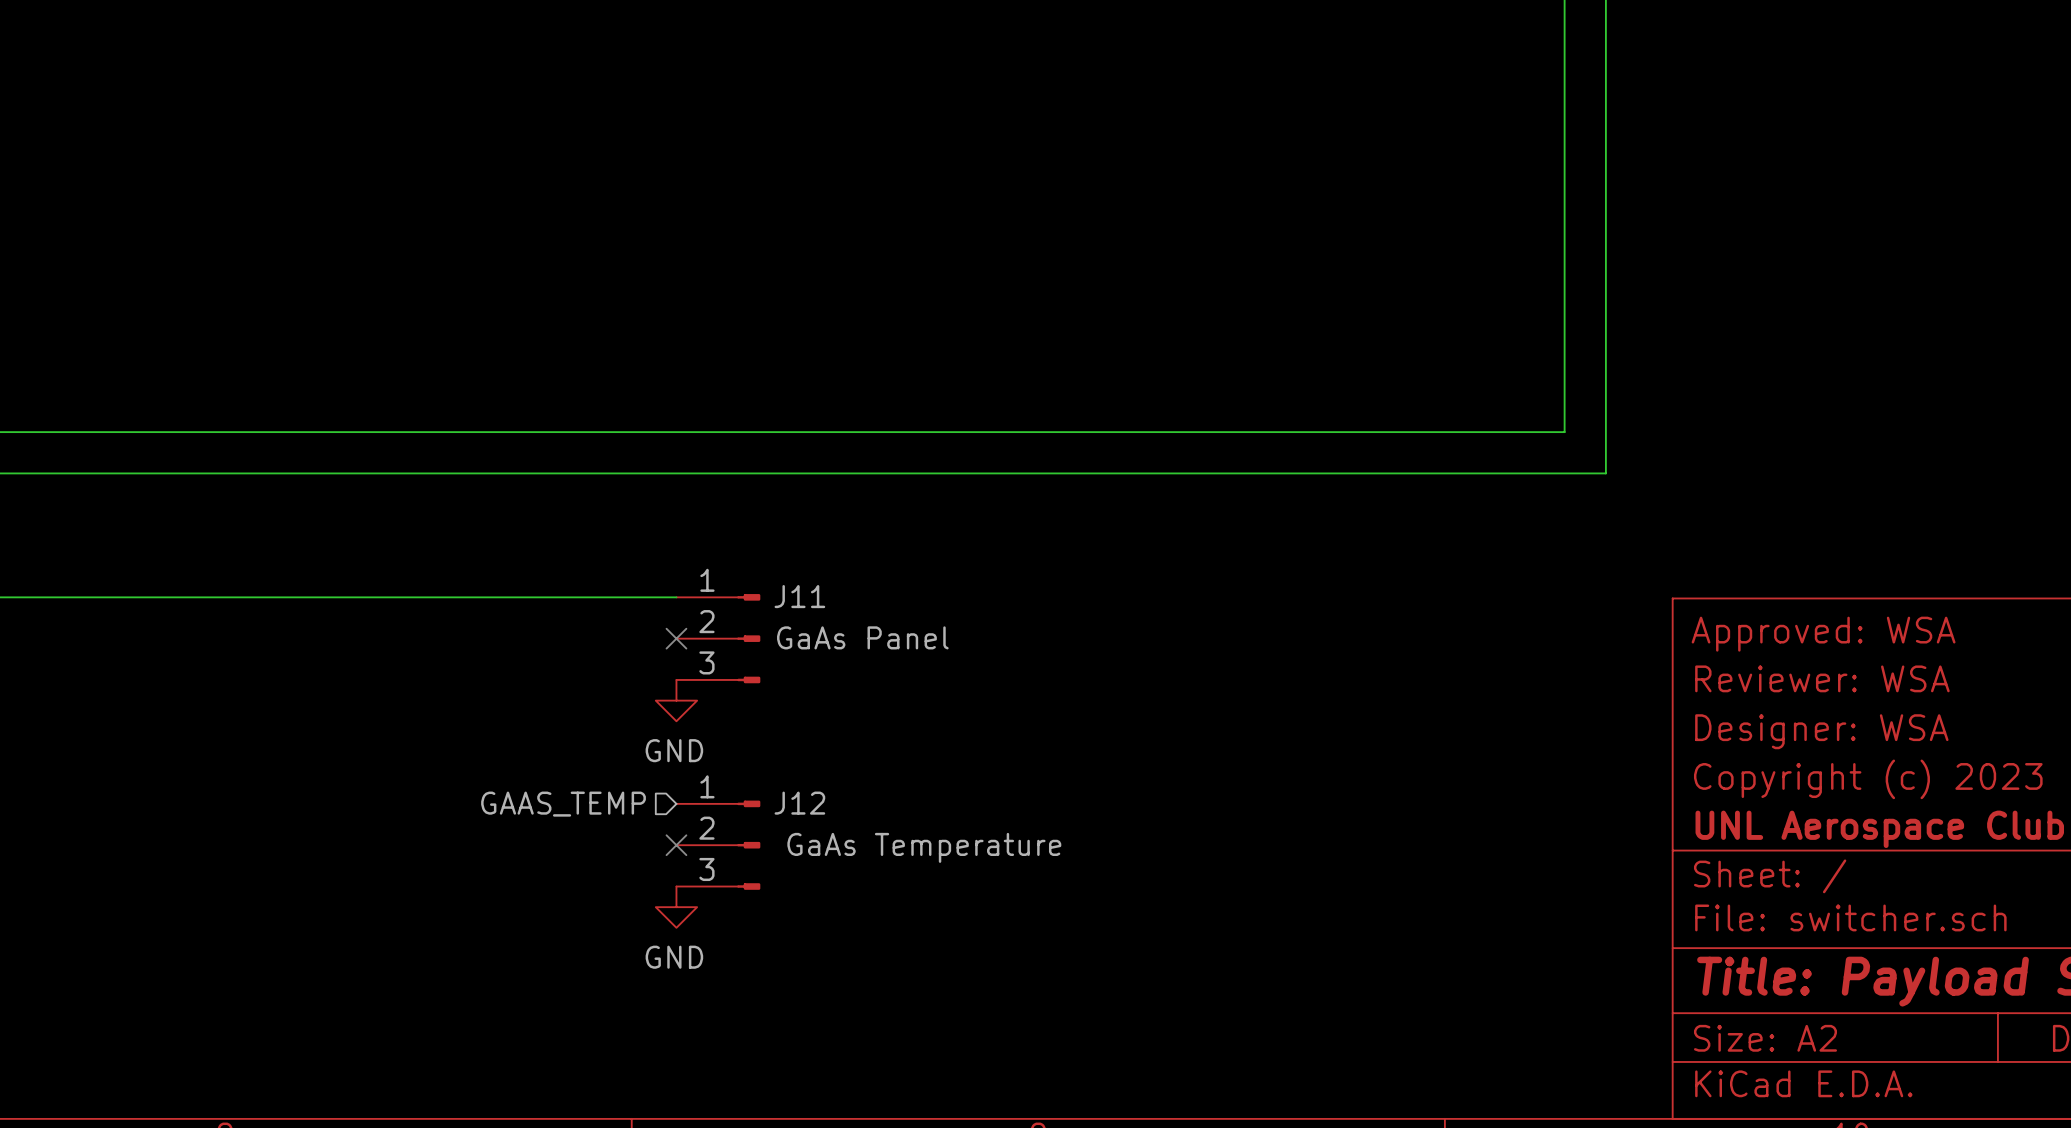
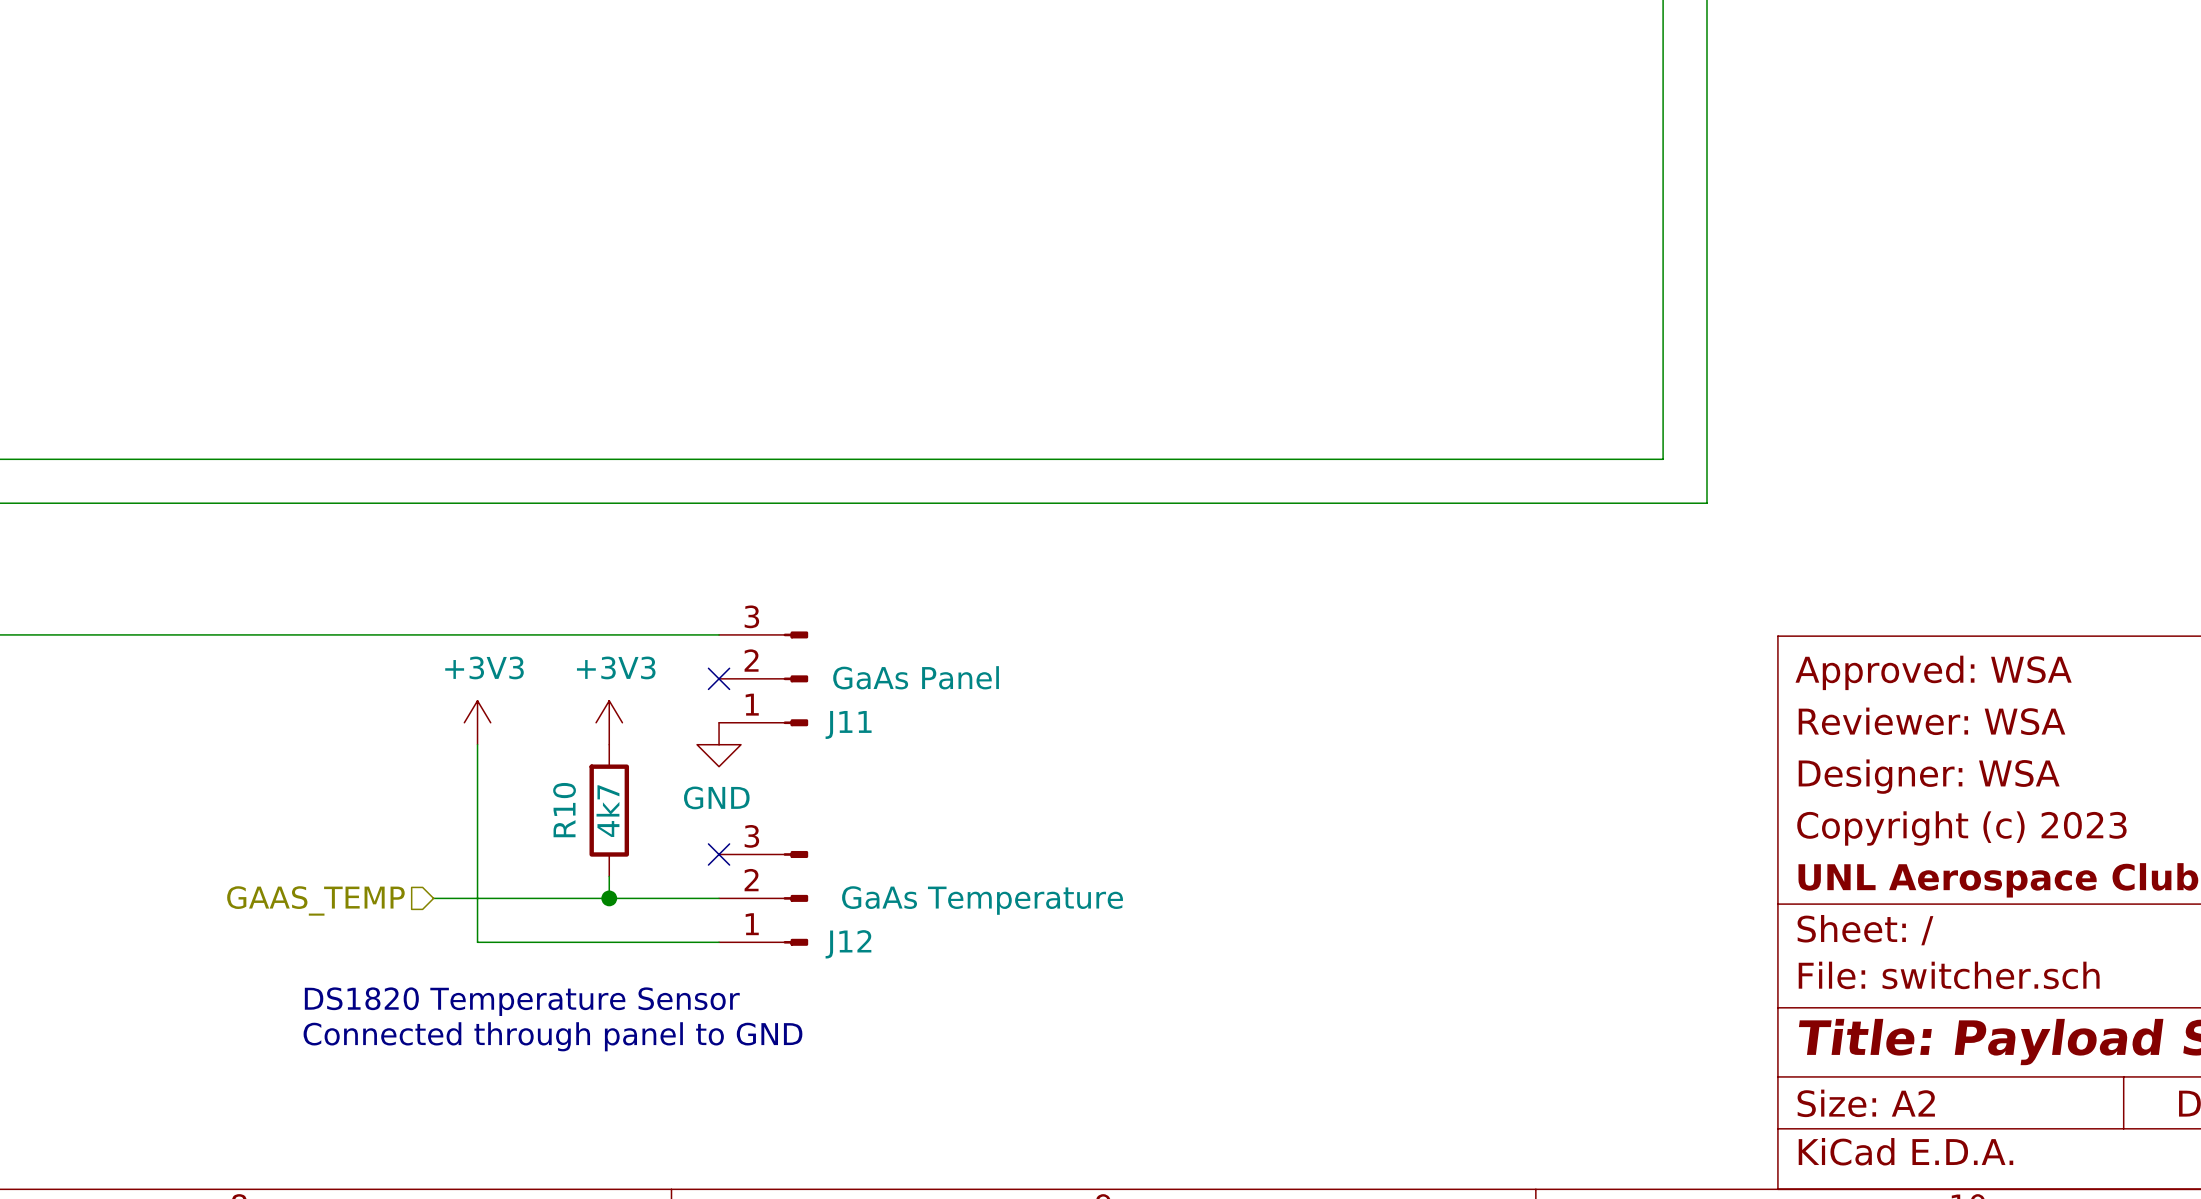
J11 flip: as is (748, 638) -> up-down (795, 678)
power symbol: none -> +3V3 (477, 722)
power symbol: none -> +3V3 (609, 722)
wire: none -> (477, 744) (477, 942) (719, 942)
R10: none -> 4k7 (609, 810)
hierarchical label position: GAAS_TEMP (563, 804) -> GAAS_TEMP (315, 900)
wire: none -> (609, 876) (609, 898)
wire: none -> (433, 898) (719, 898)
junction: none -> (609, 898)
no-connect mark position: (676, 845) -> (719, 854)
J12 flip: as is (748, 845) -> up-down (795, 898)
power symbol: GND (676, 907) -> none
text: none -> DS1820 Temperature Sensor (522, 1001)
text: none -> Connected through panel to GND (552, 1036)

